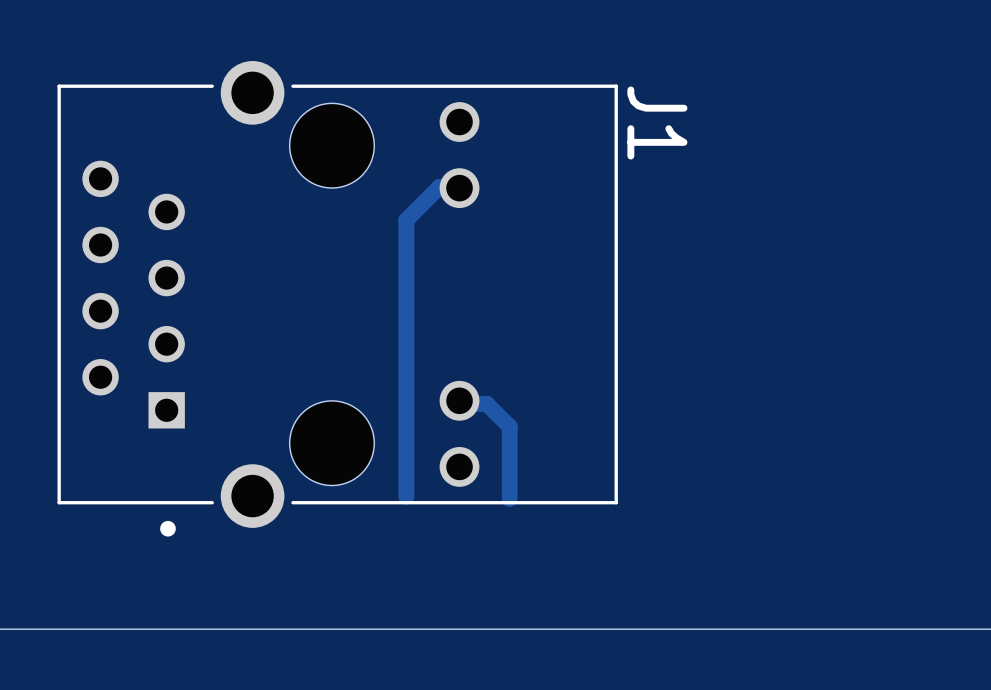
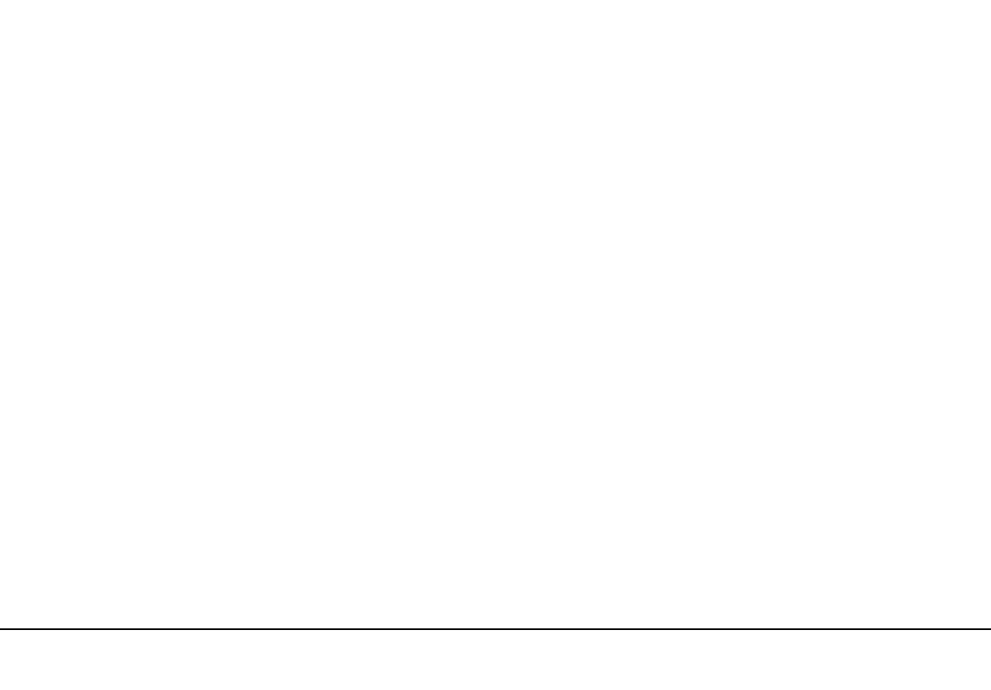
track: (459, 188) (439, 187) (406, 220) (406, 496) -> none
J1: (337, 298) -> none
track: (459, 400) (462, 403) (486, 403) (509, 426) (509, 499) -> none

